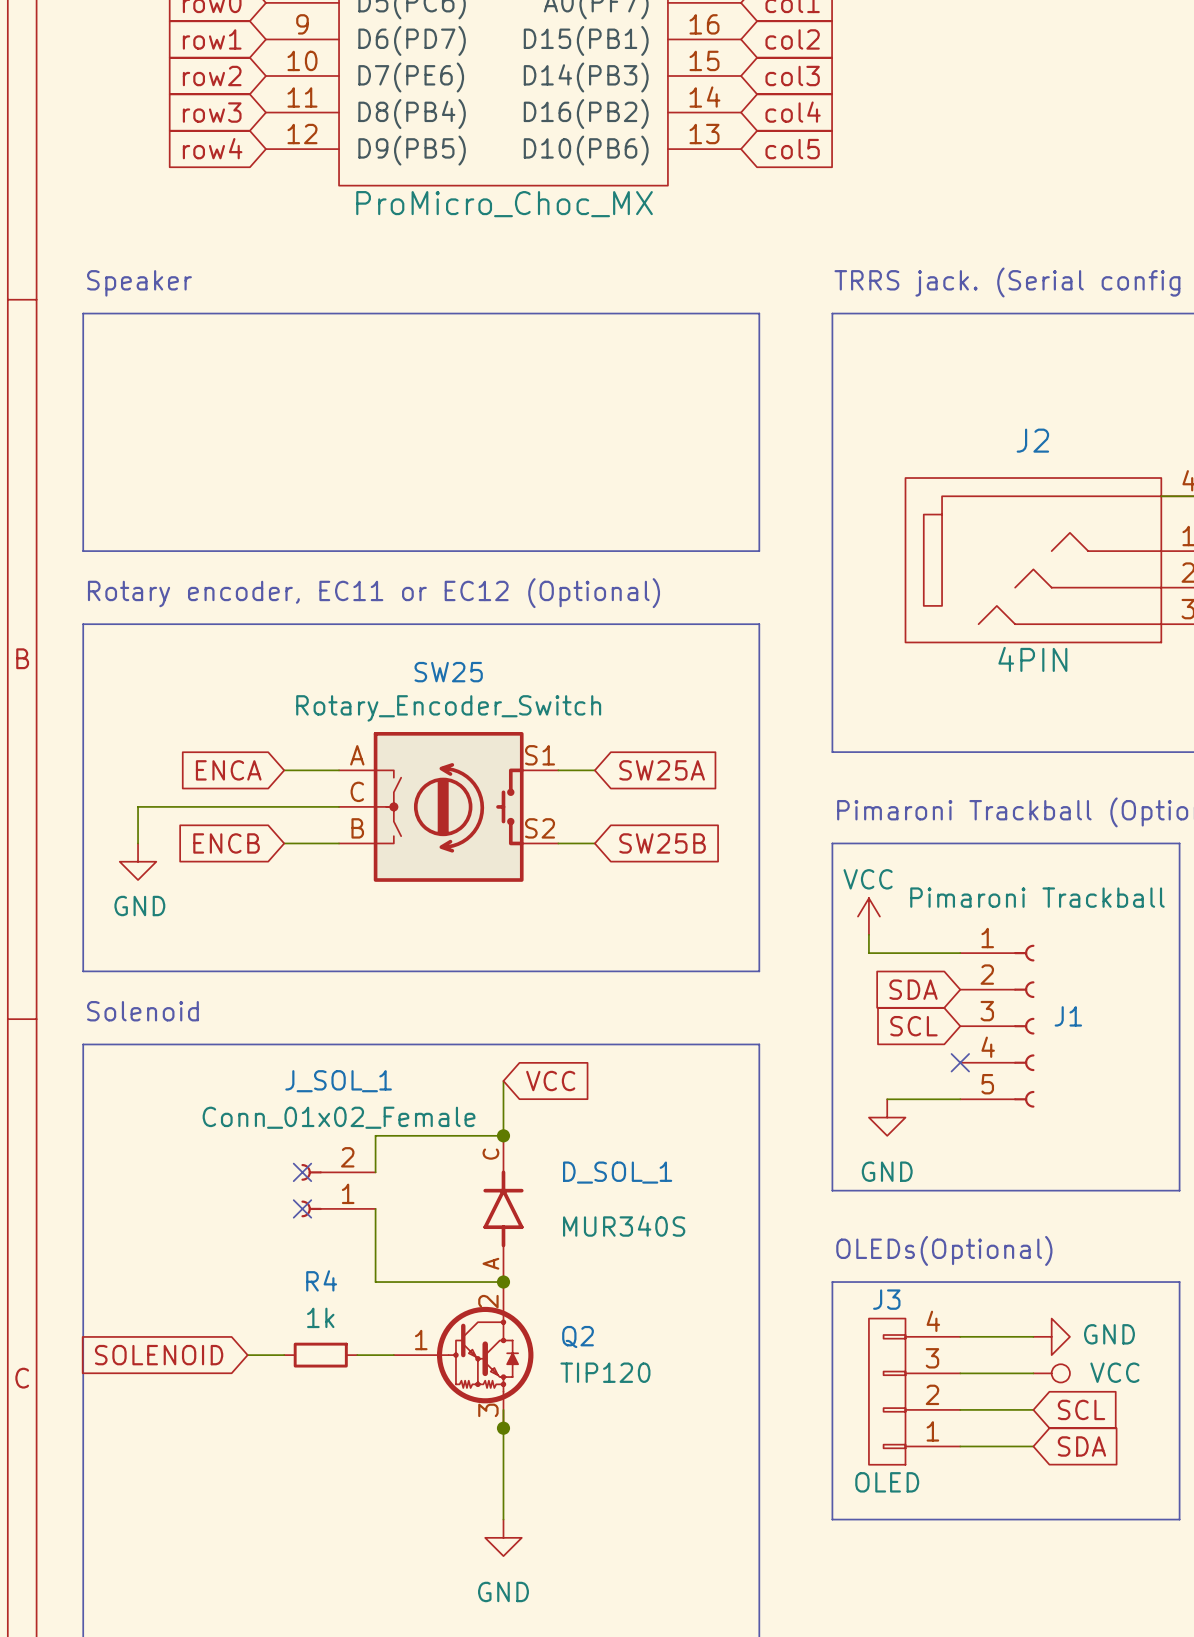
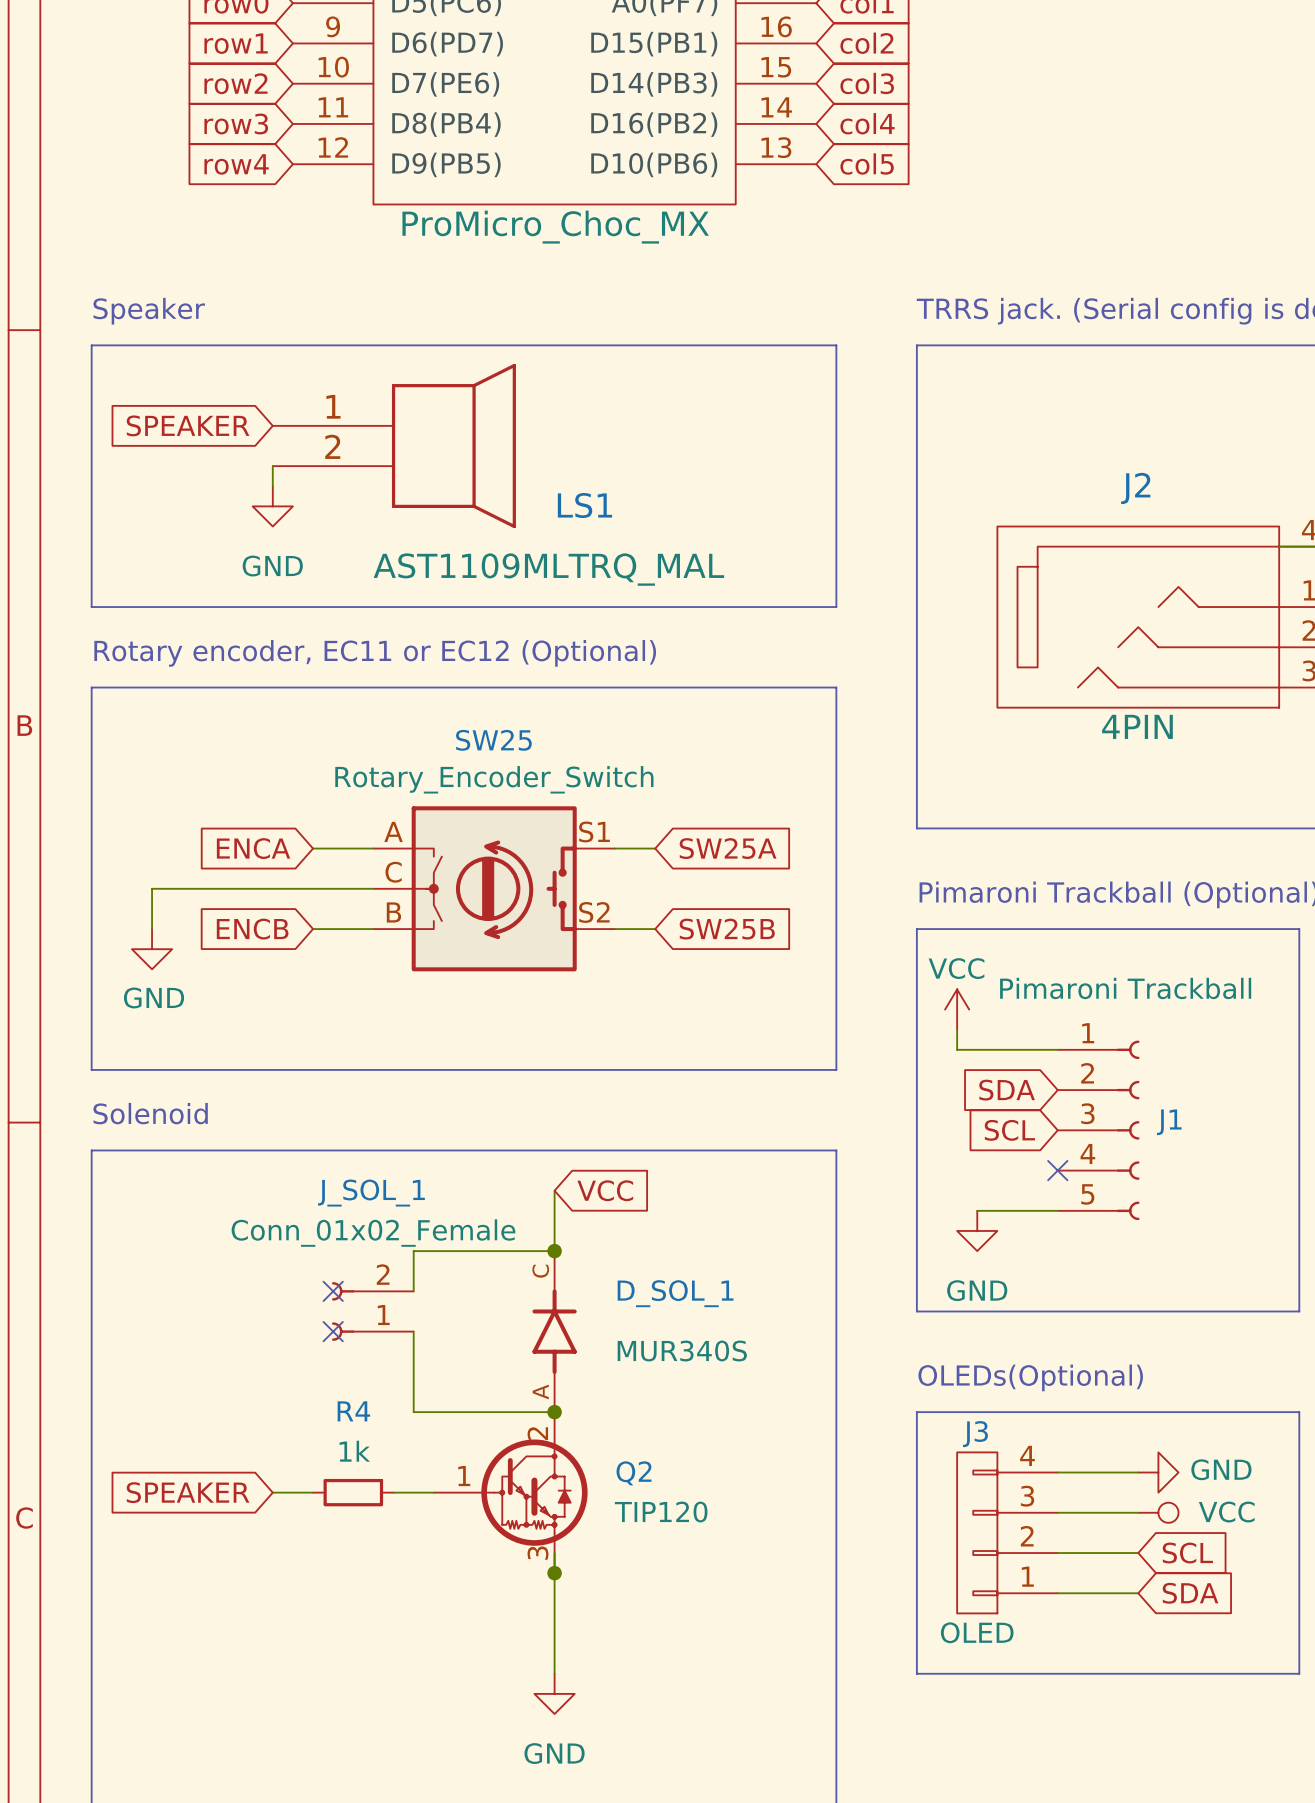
global label: none -> SPEAKER (188, 425)
LS1: none -> AST1109MLTRQ_MAL (394, 446)
wire: none -> (272, 466) (272, 486)
power symbol: none -> GND (272, 506)
global label: SOLENOID (159, 1355) -> SPEAKER (188, 1492)

